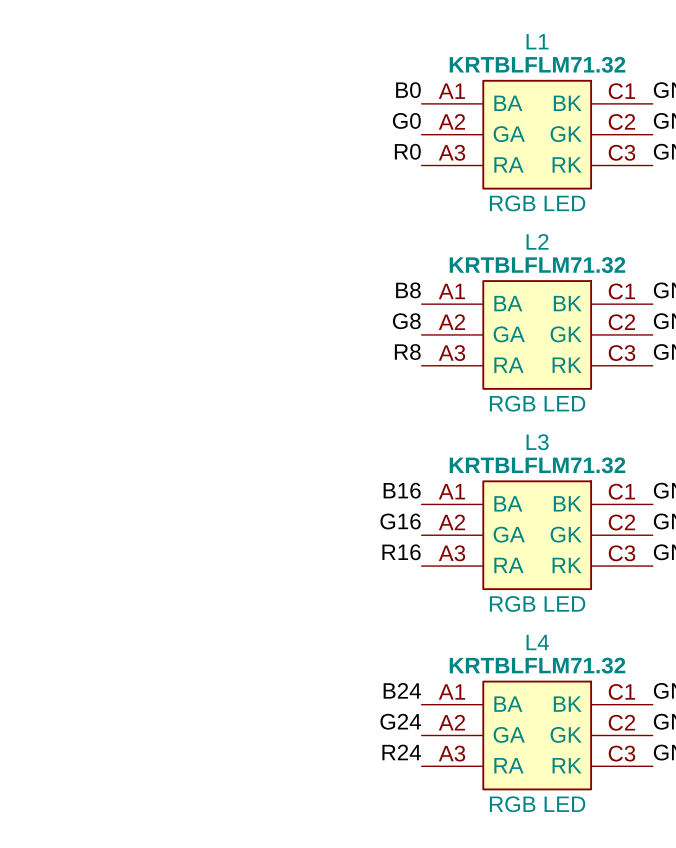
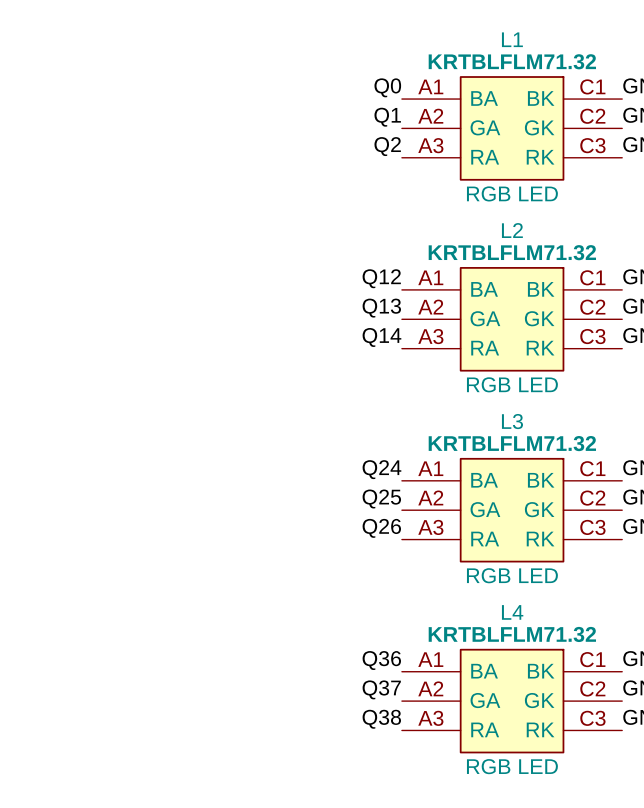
label: B0 (408, 90) -> Q0 (387, 87)
label: G0 (406, 120) -> Q1 (387, 117)
label: R0 (407, 151) -> Q2 (387, 146)
label: B8 (408, 290) -> Q12 (381, 278)
label: G8 (406, 321) -> Q13 (381, 308)
label: R8 (407, 352) -> Q14 (381, 337)
label: B16 (402, 490) -> Q24 (381, 469)
label: G16 (400, 521) -> Q25 (381, 499)
label: R16 (401, 552) -> Q26 (381, 528)
label: B24 (402, 690) -> Q36 (381, 660)
label: G24 (400, 721) -> Q37 (381, 689)
label: R24 (401, 752) -> Q38 (381, 719)

